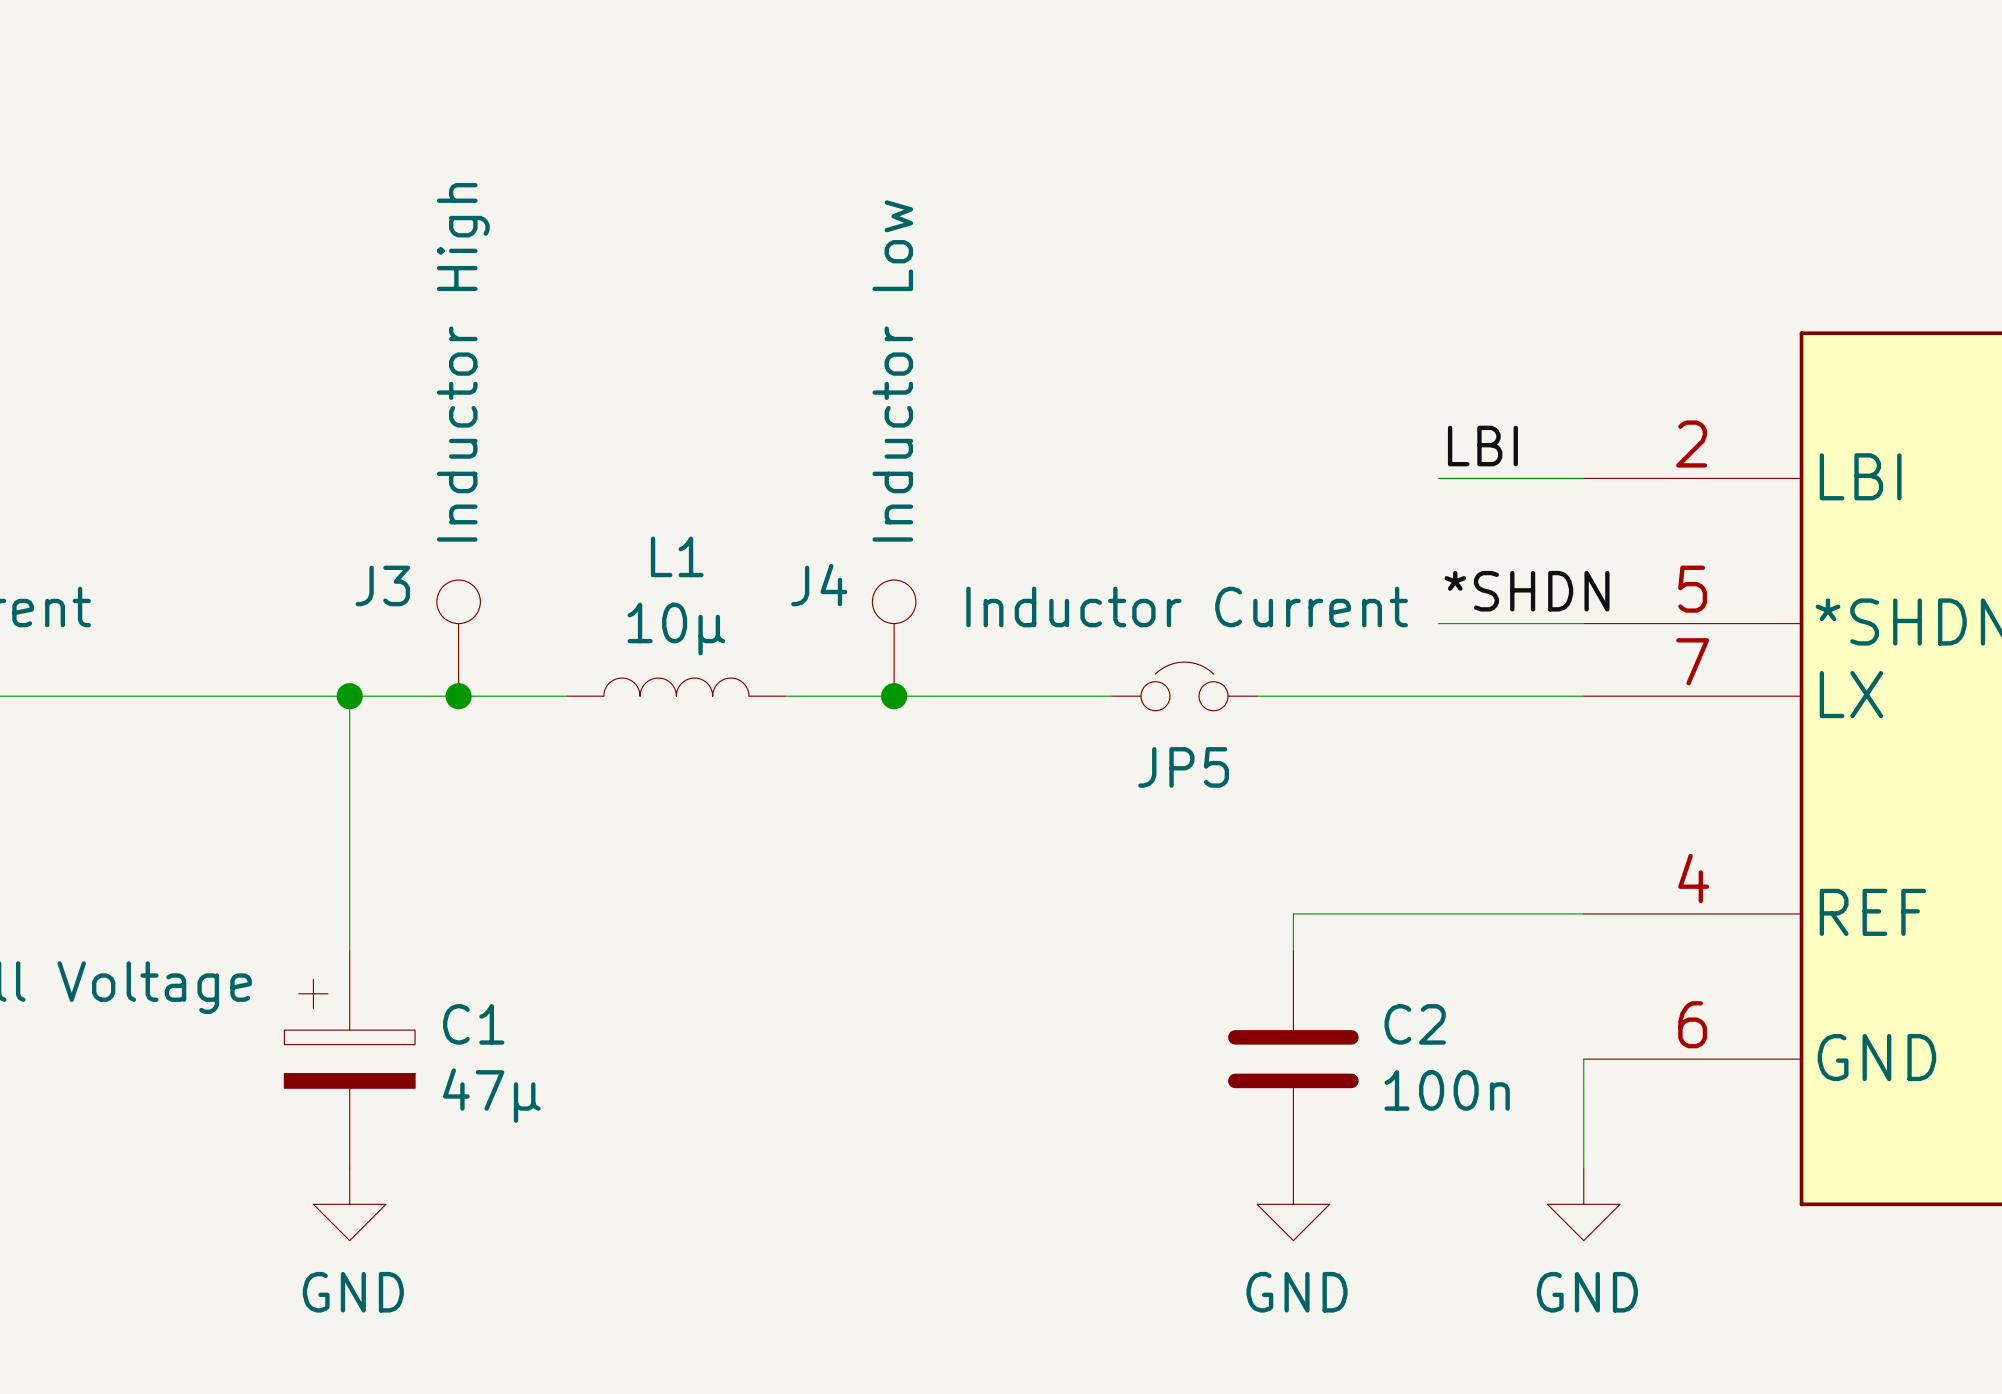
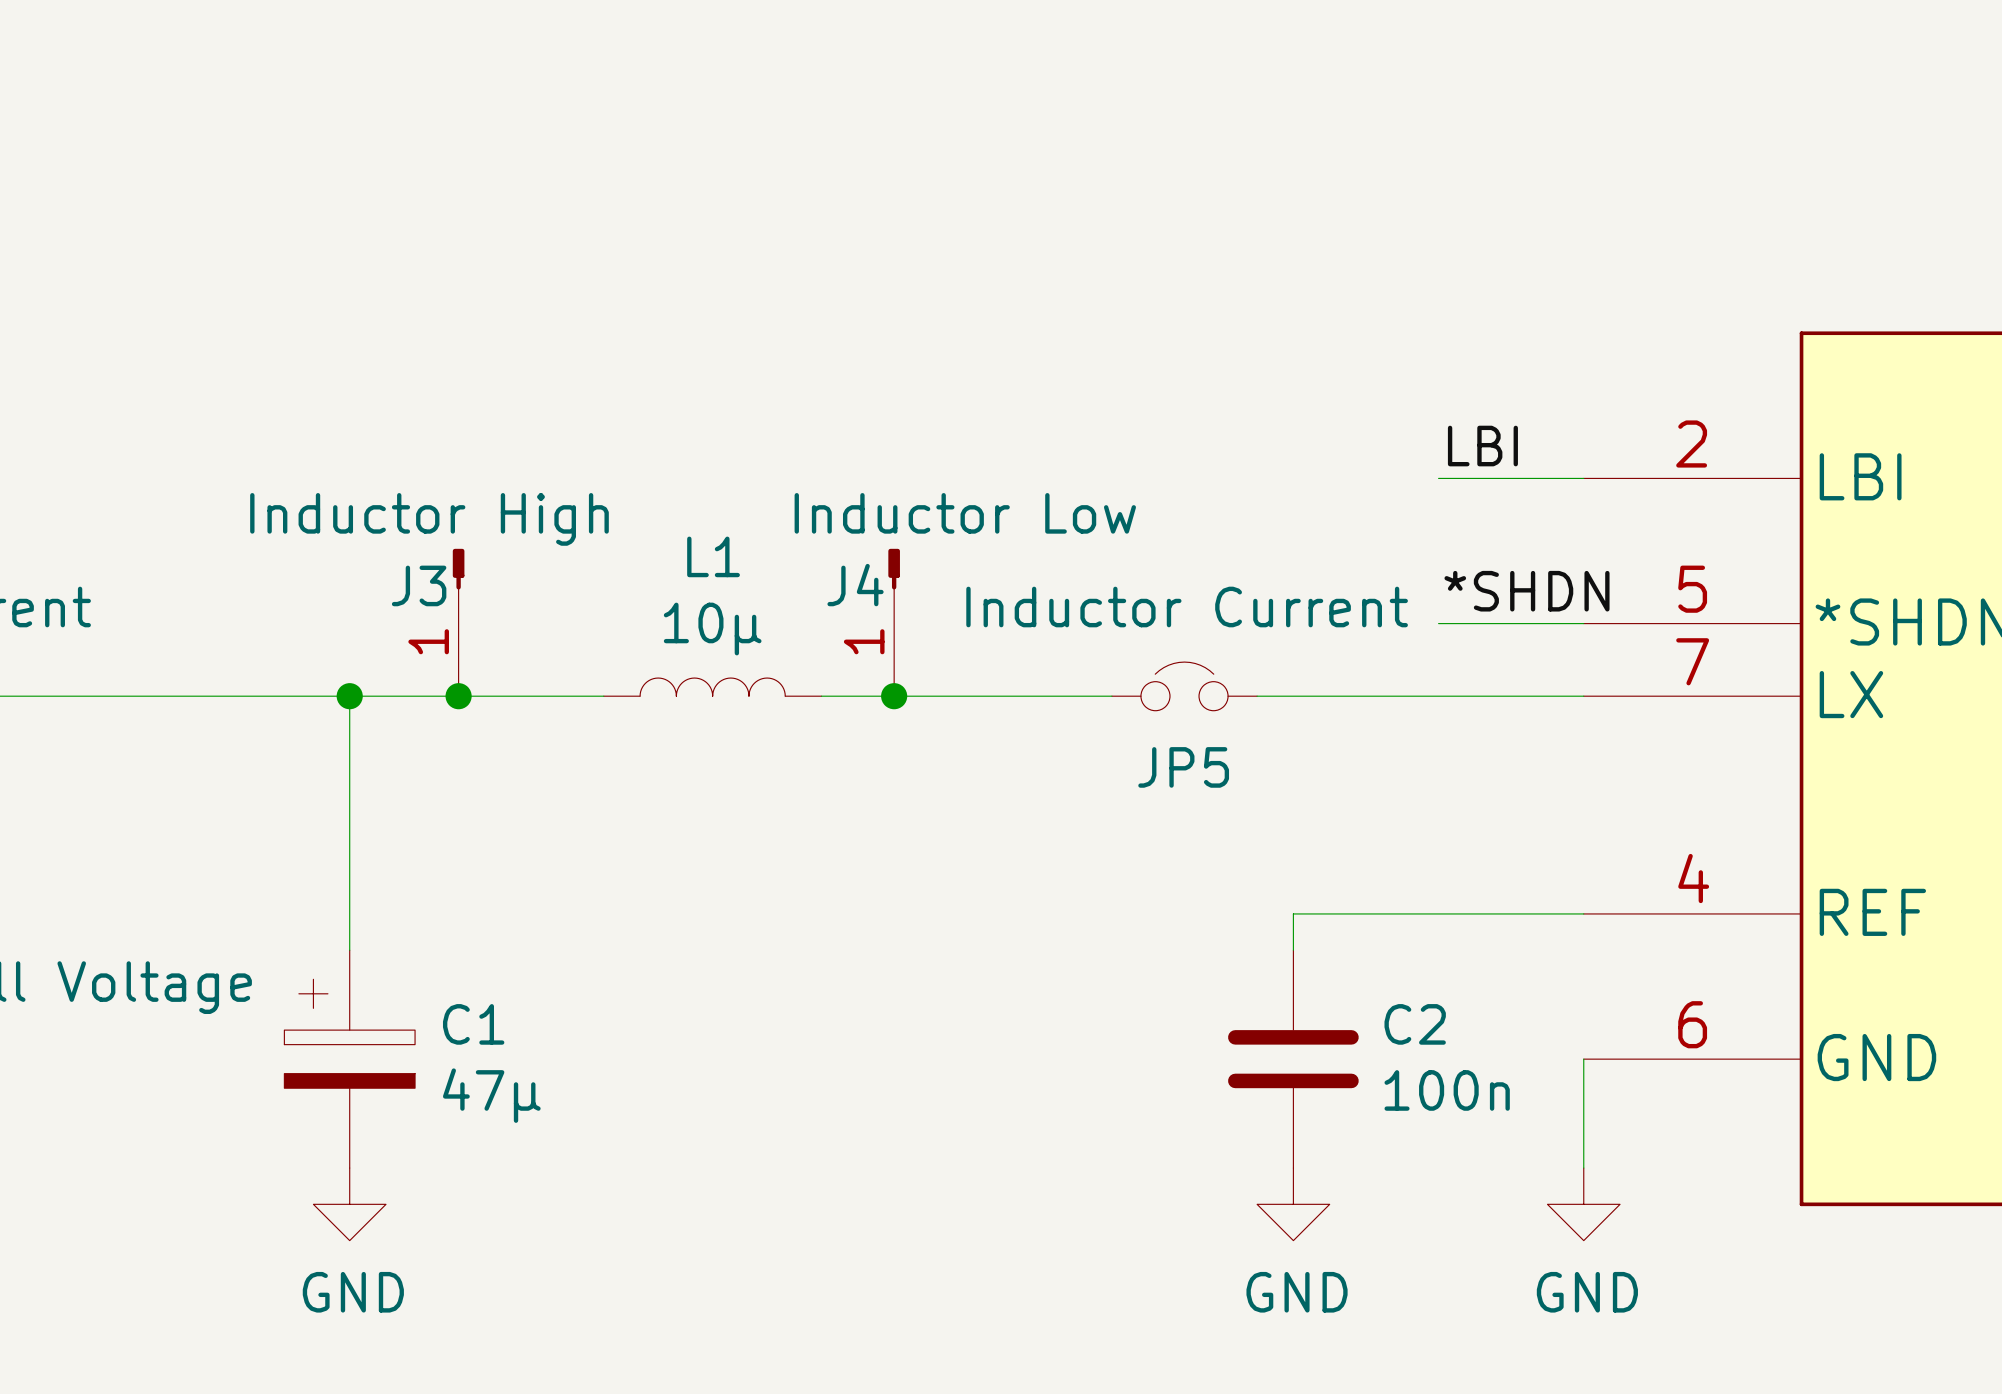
J3 value position: Inductor High (463, 362) -> Inductor High (429, 519)
J4 value position: Inductor Low (892, 370) -> Inductor Low (965, 513)
J3 symbol: [436, 580, 481, 697] -> [452, 548, 465, 697]
J4 symbol: [872, 580, 916, 697] -> [888, 548, 900, 697]
L1 position: (676, 687) -> (712, 687)

